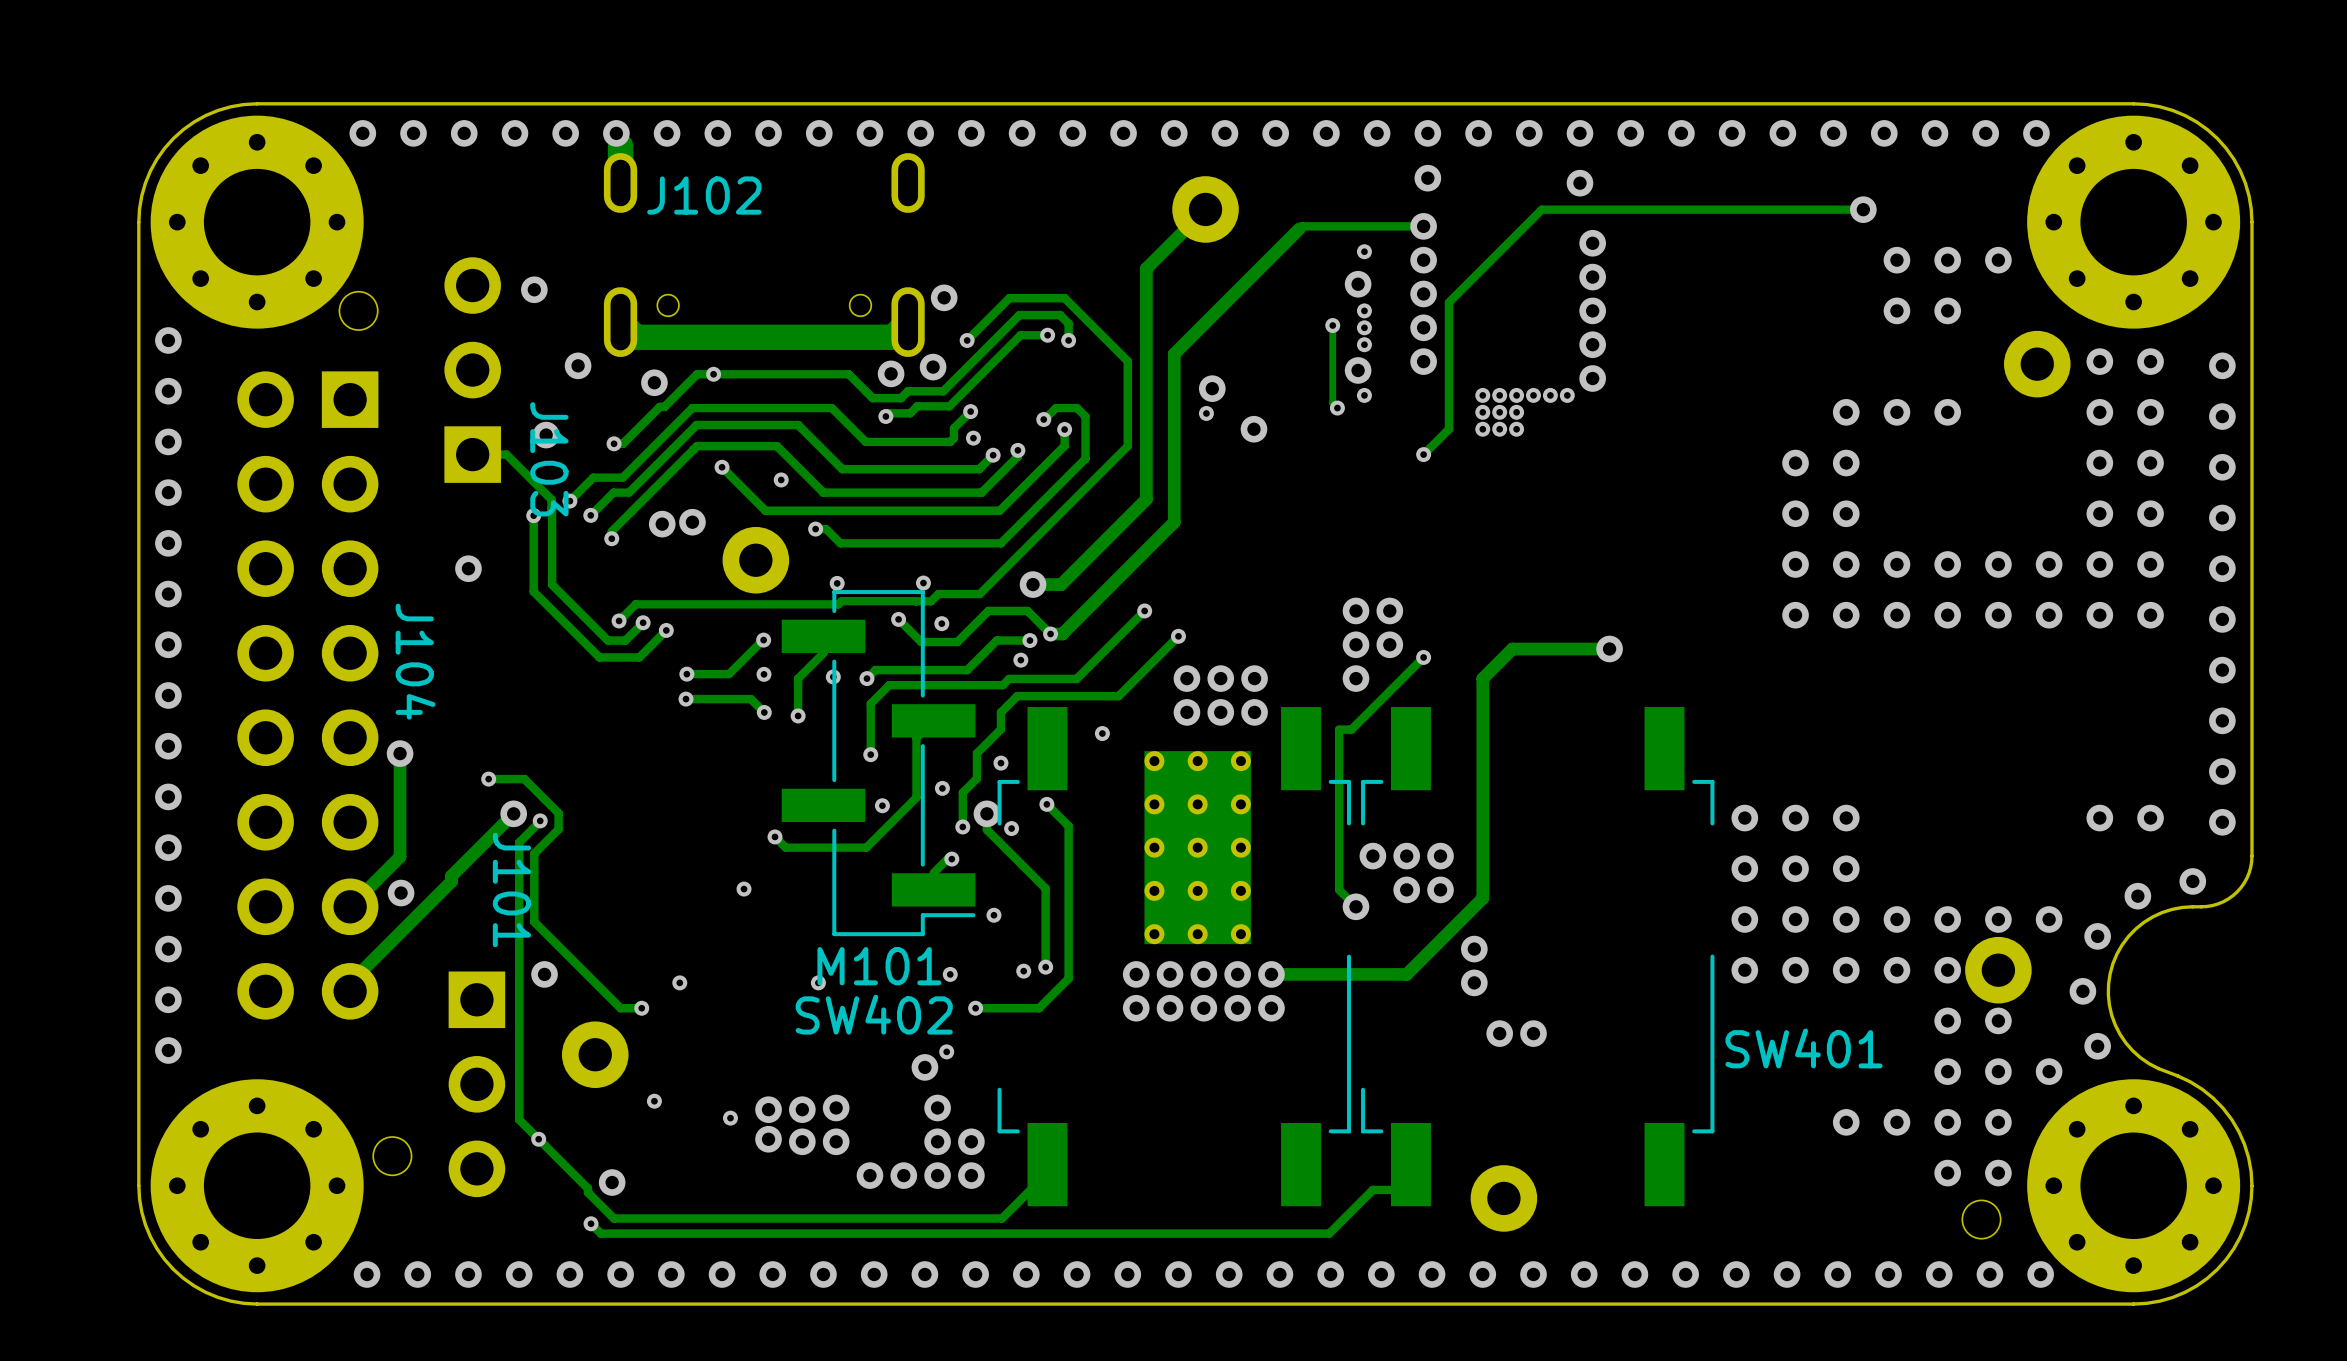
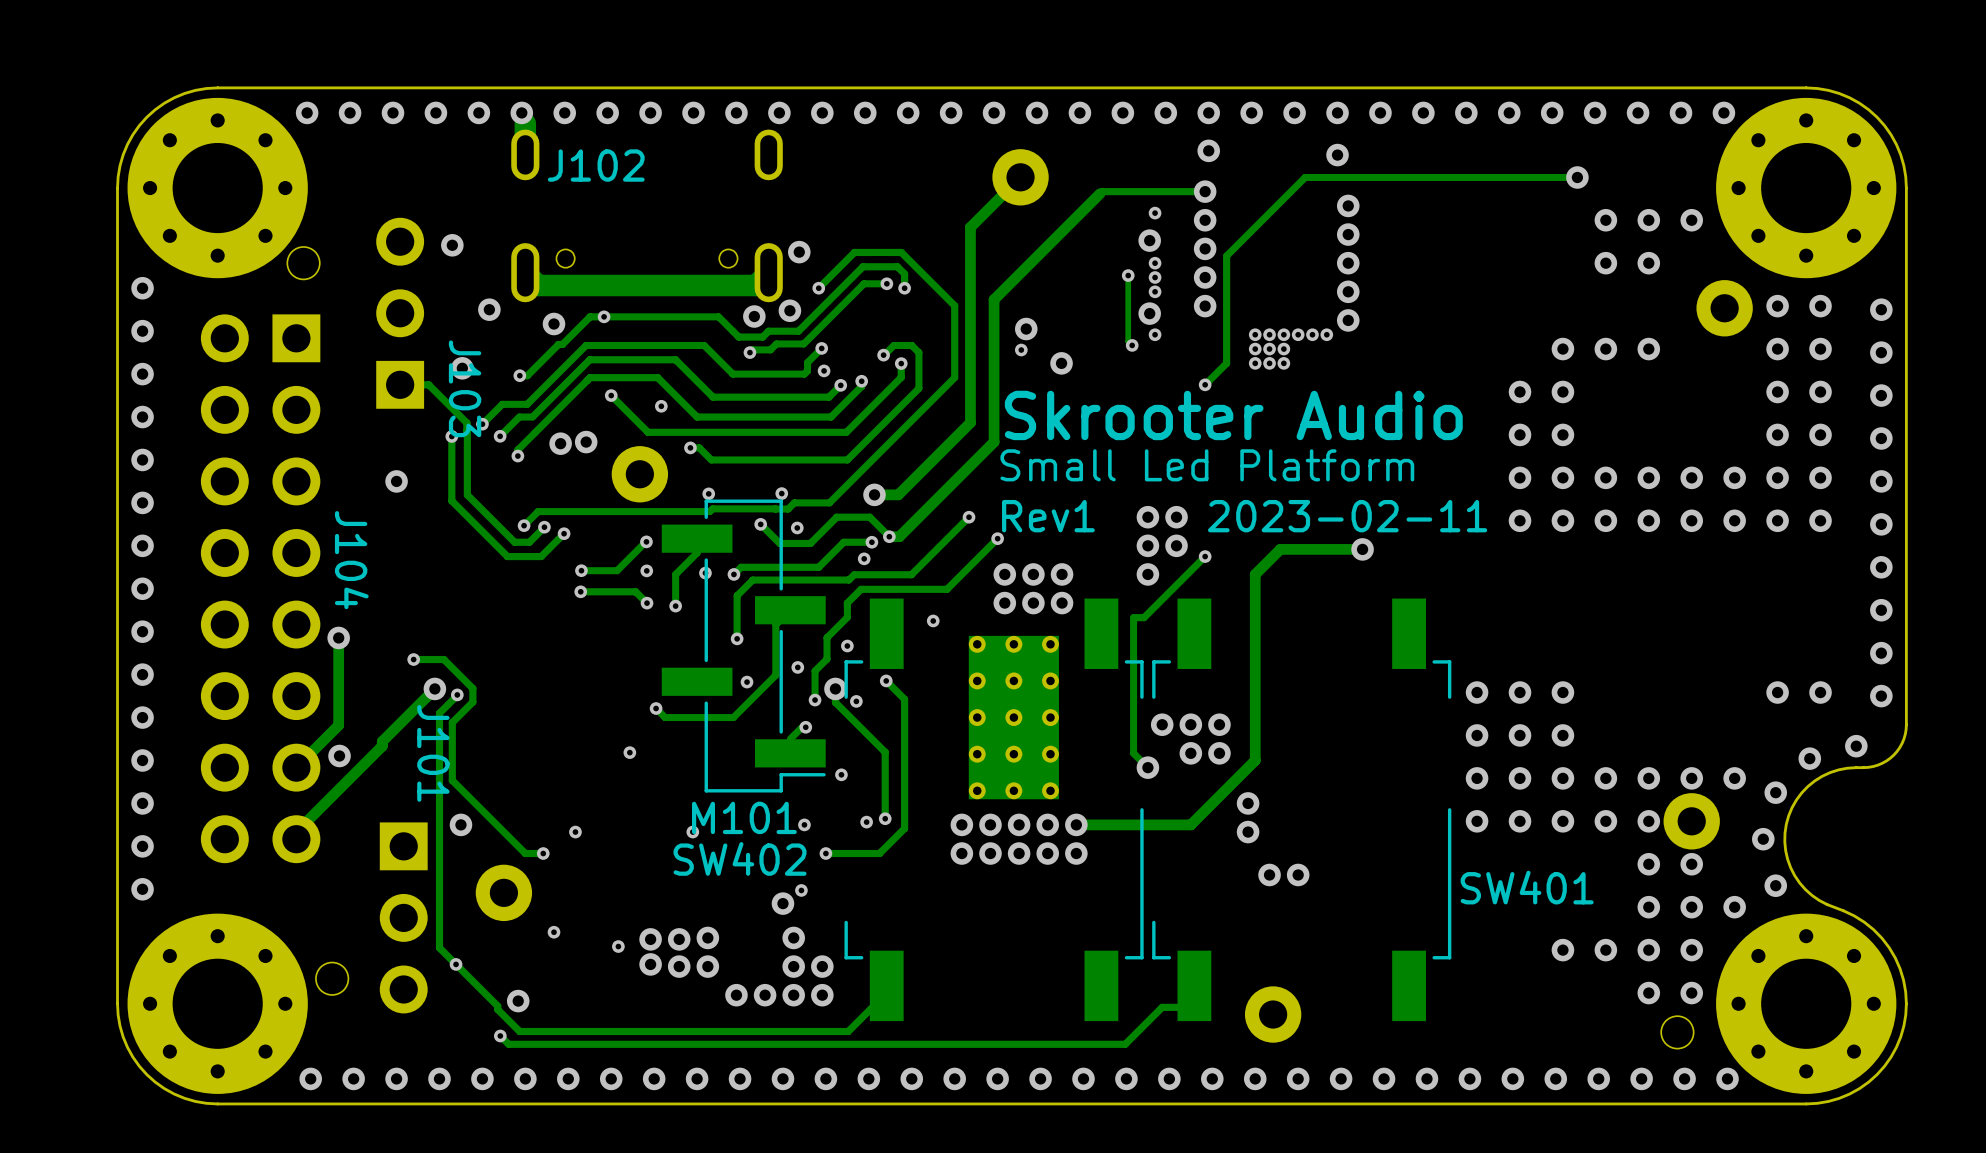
text: none -> Skrooter Audio (1233, 415)
text: none -> Small Led Platform (1207, 465)
text: none -> Rev1 (1048, 516)
text: none -> 2023-02-11 (1347, 516)

